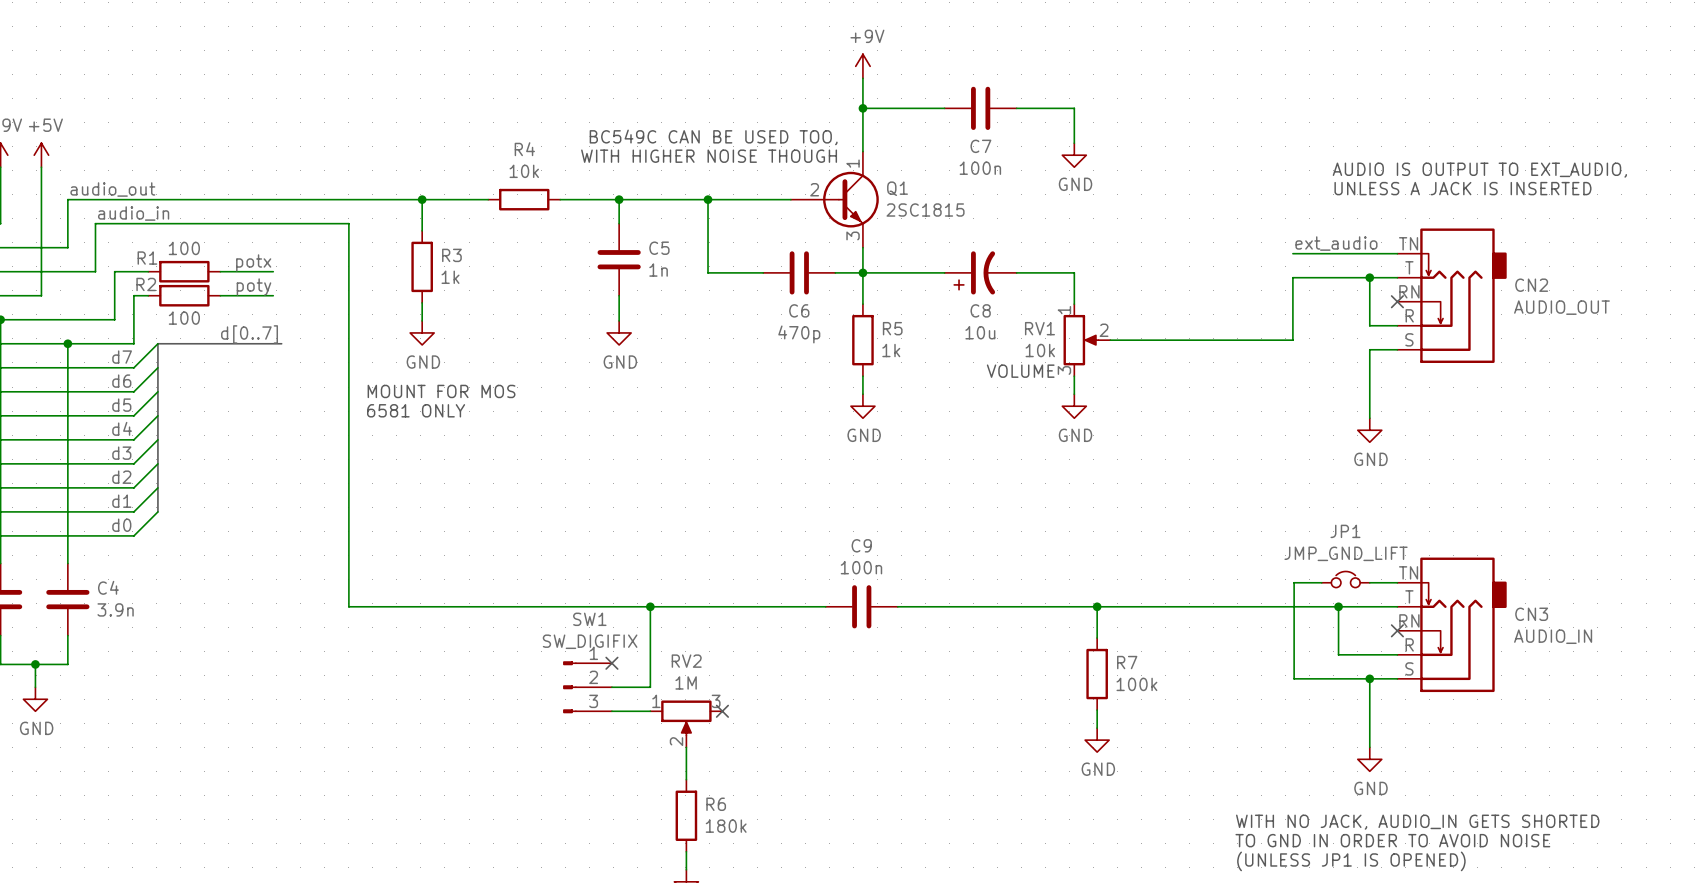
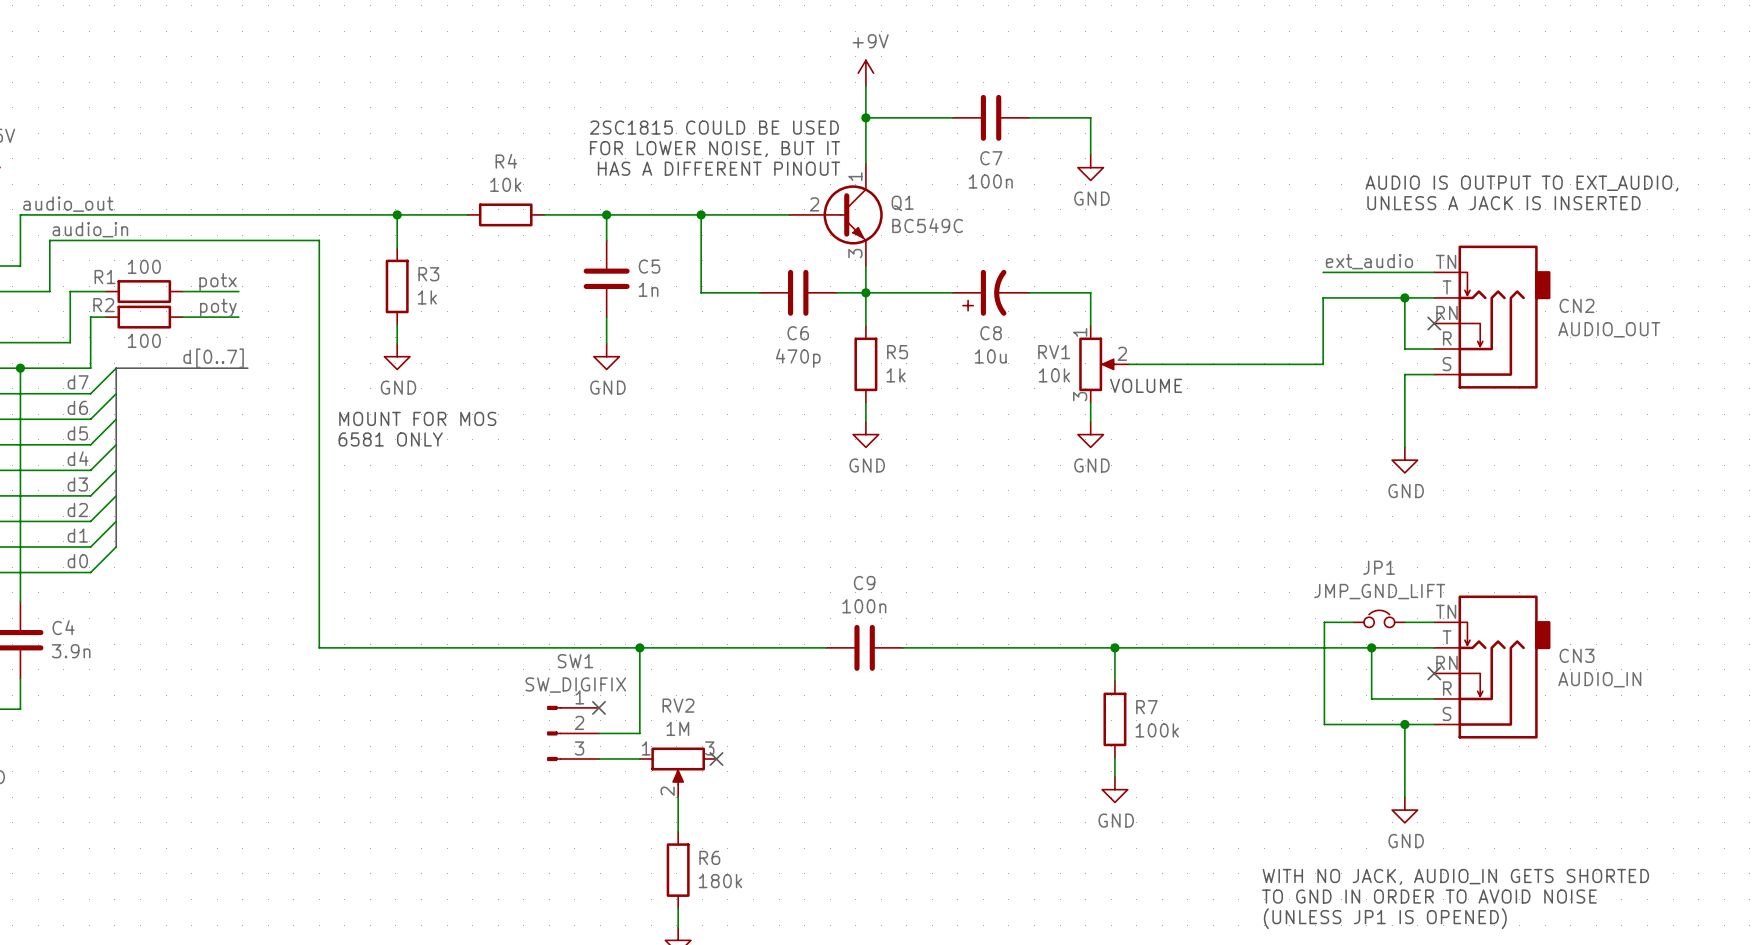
text: none -> 2SC1815 COULD BE USED (714, 127)
text: BC549C CAN BE USED TOO, (713, 137) -> FOR LOWER NOISE, BUT IT (715, 149)
text: WITH HIGHER NOISE THOUGH (709, 156) -> HAS A DIFFERENT PINOUT (719, 168)
Q1 value: 2SC1815 (925, 210) -> BC549C (927, 225)
text position: VOLUME (1020, 371) -> VOLUME (1146, 385)

